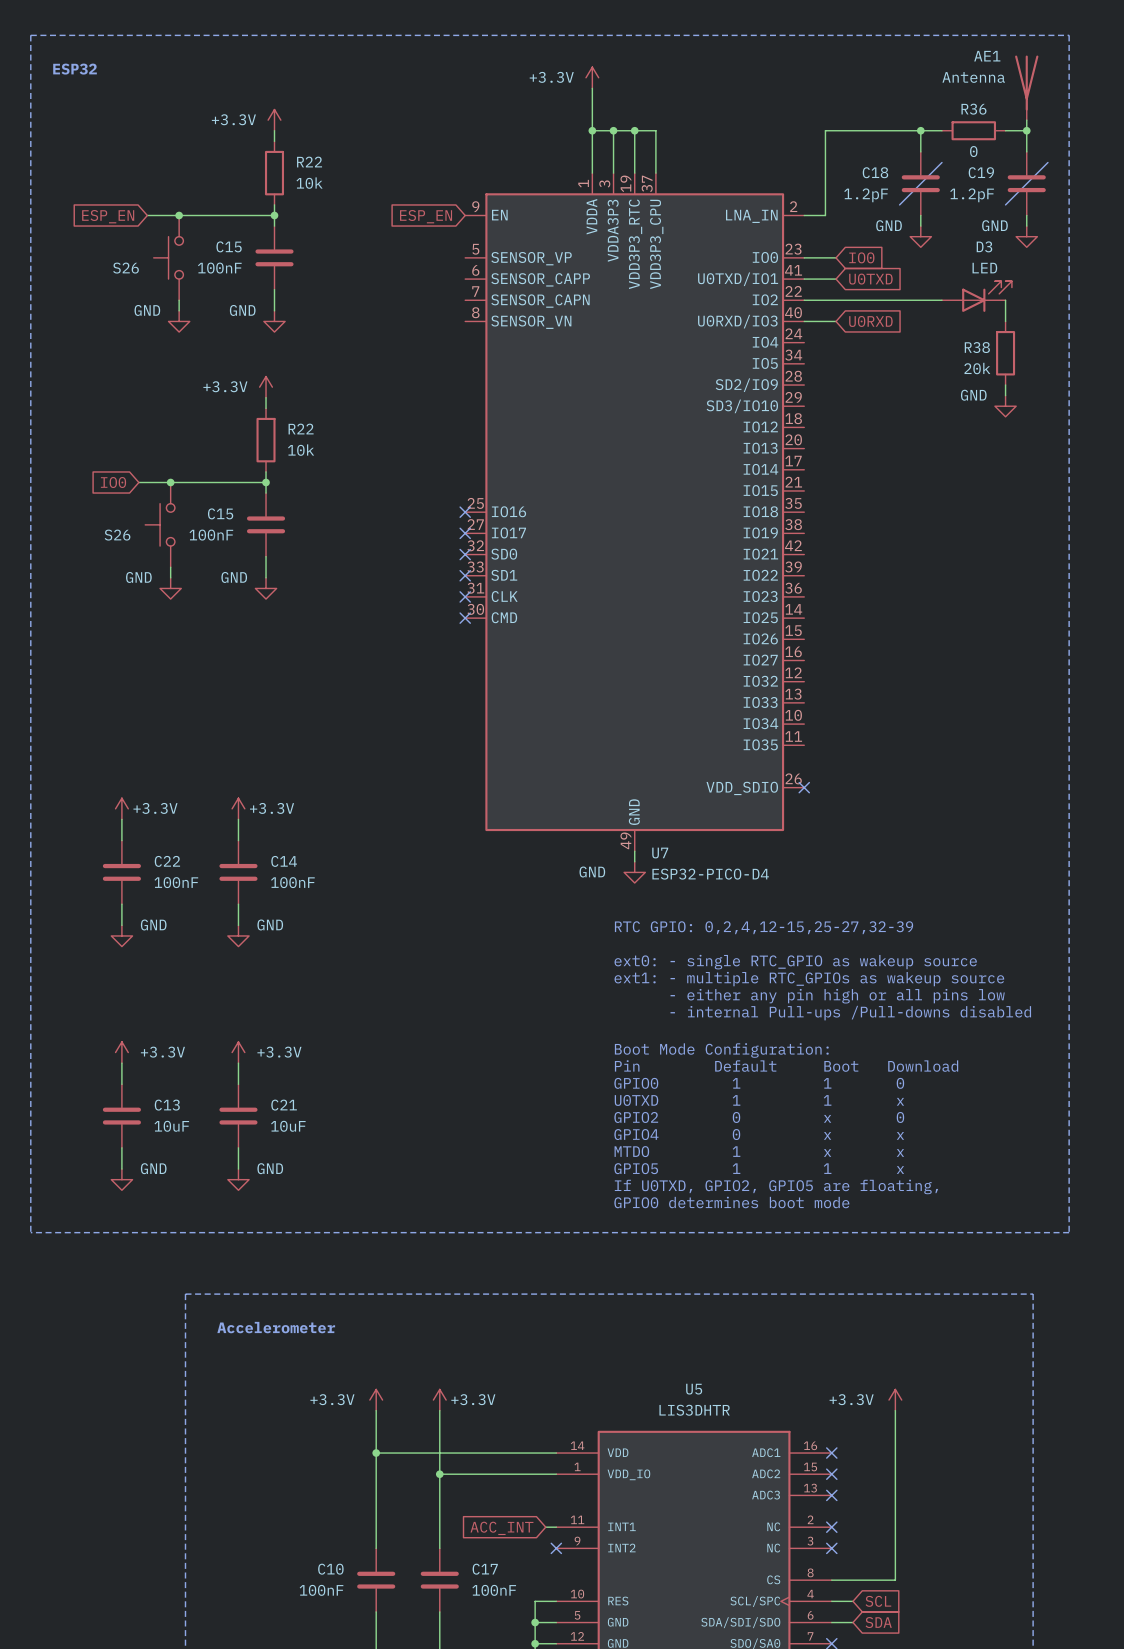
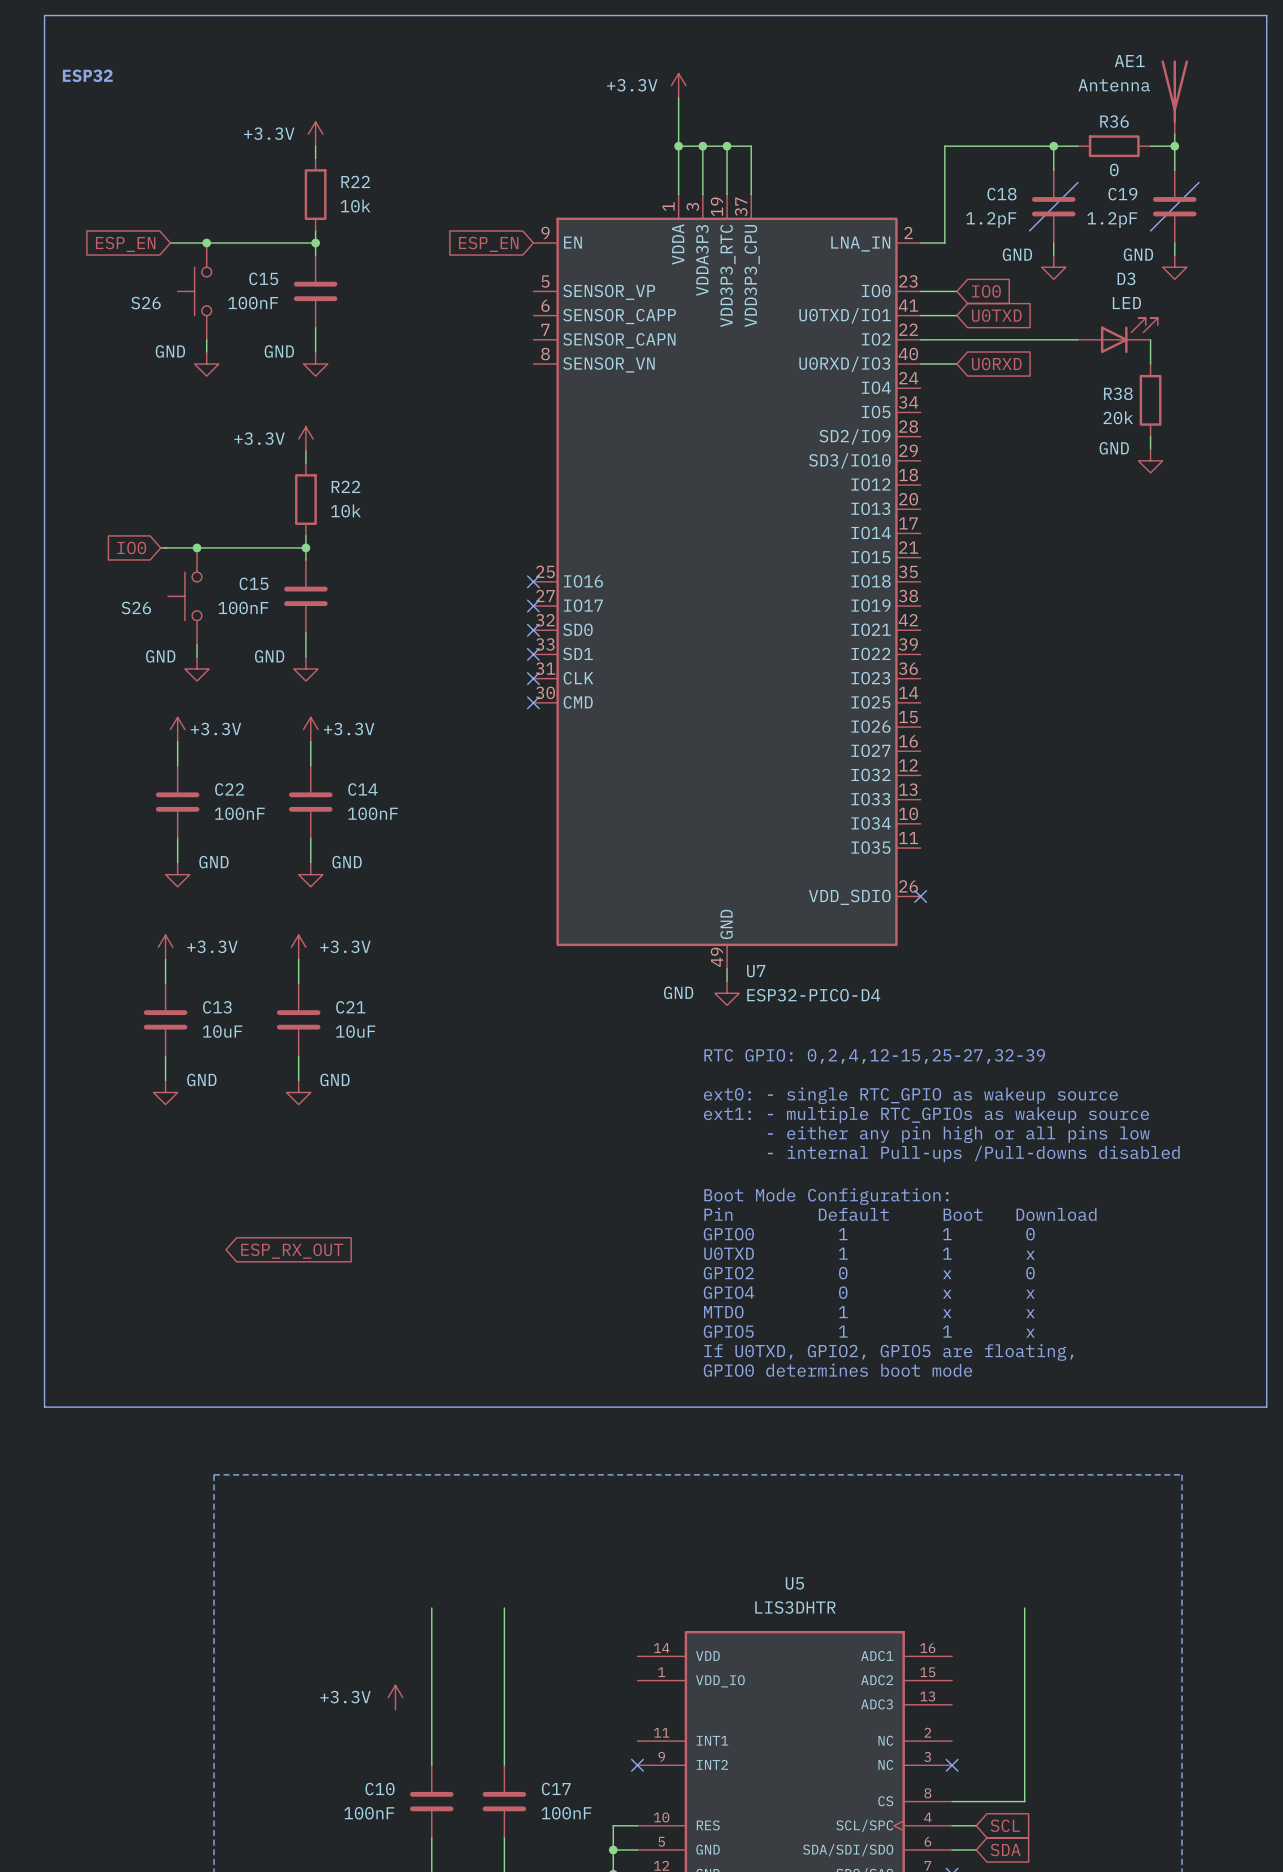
line: (30, 35) (1069, 35) (1069, 1232) (30, 1232) (30, 35) -> (44, 15) (44, 1407) (1266, 1407) (1266, 15) (44, 15)
power symbol: none -> +3.3V (177, 729)
power symbol: none -> +3.3V (310, 729)
wire: none -> (177, 741) (177, 765)
wire: none -> (310, 741) (310, 765)
wire: none -> (177, 838) (177, 862)
wire: none -> (310, 838) (310, 862)
power symbol: none -> GND (177, 874)
power symbol: none -> GND (310, 874)
power symbol position: +3.3V (121, 808) -> +3.3V (165, 947)
power symbol text position: +3.3V (155, 808) -> +3.3V (212, 946)
power symbol position: +3.3V (238, 808) -> +3.3V (298, 947)
power symbol text position: +3.3V (272, 808) -> +3.3V (345, 946)
wire: (121, 819) (121, 840) -> (165, 959) (165, 983)
wire: (238, 819) (238, 840) -> (298, 959) (298, 983)
C22 position: (121, 872) -> (177, 802)
C14 position: (238, 872) -> (310, 802)
wire: (121, 904) (121, 925) -> (165, 1056) (165, 1080)
wire: (238, 904) (238, 925) -> (298, 1056) (298, 1080)
power symbol position: GND (121, 935) -> GND (165, 1092)
power symbol position: GND (238, 935) -> GND (298, 1092)
power symbol: +3.3V (121, 1052) -> none
power symbol: +3.3V (238, 1052) -> none
wire: (121, 1063) (121, 1084) -> none
wire: (238, 1063) (238, 1084) -> none
global label: none -> ESP_RX_OUT (292, 1251)
C13 position: (121, 1116) -> (165, 1019)
C21 position: (238, 1116) -> (298, 1019)
wire: (121, 1147) (121, 1169) -> none
wire: (238, 1147) (238, 1169) -> none
power symbol: GND (121, 1179) -> none
power symbol: GND (238, 1179) -> none
text: Accelerometer (276, 1327) -> none
power symbol: +3.3V (376, 1400) -> none
power symbol: +3.3V (439, 1400) -> none
power symbol: +3.3V (895, 1400) -> none
wire: (376, 1453) (556, 1453) -> none
junction: (376, 1453) -> none
no-connect mark: (831, 1453) -> none
wire: (439, 1474) (556, 1474) -> none
junction: (439, 1474) -> none
no-connect mark: (831, 1474) -> none
power symbol: none -> +3.3V (395, 1697)
no-connect mark: (831, 1495) -> none
wire: (545, 1527) (556, 1527) -> none
no-connect mark: (831, 1527) -> none
global label: ACC_INT (501, 1528) -> none

